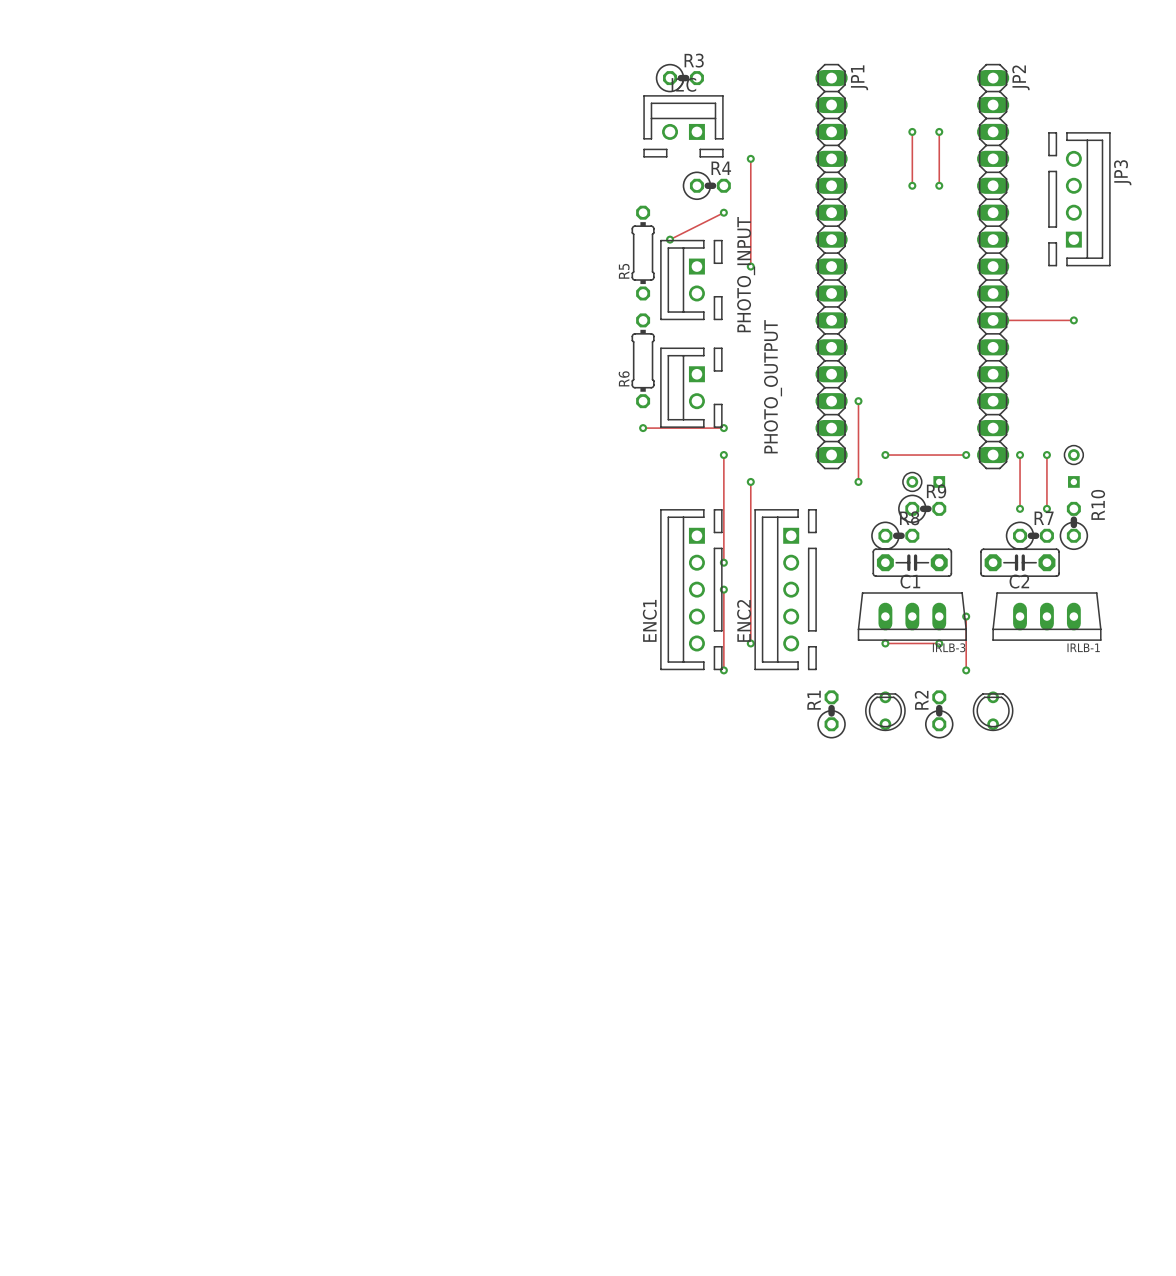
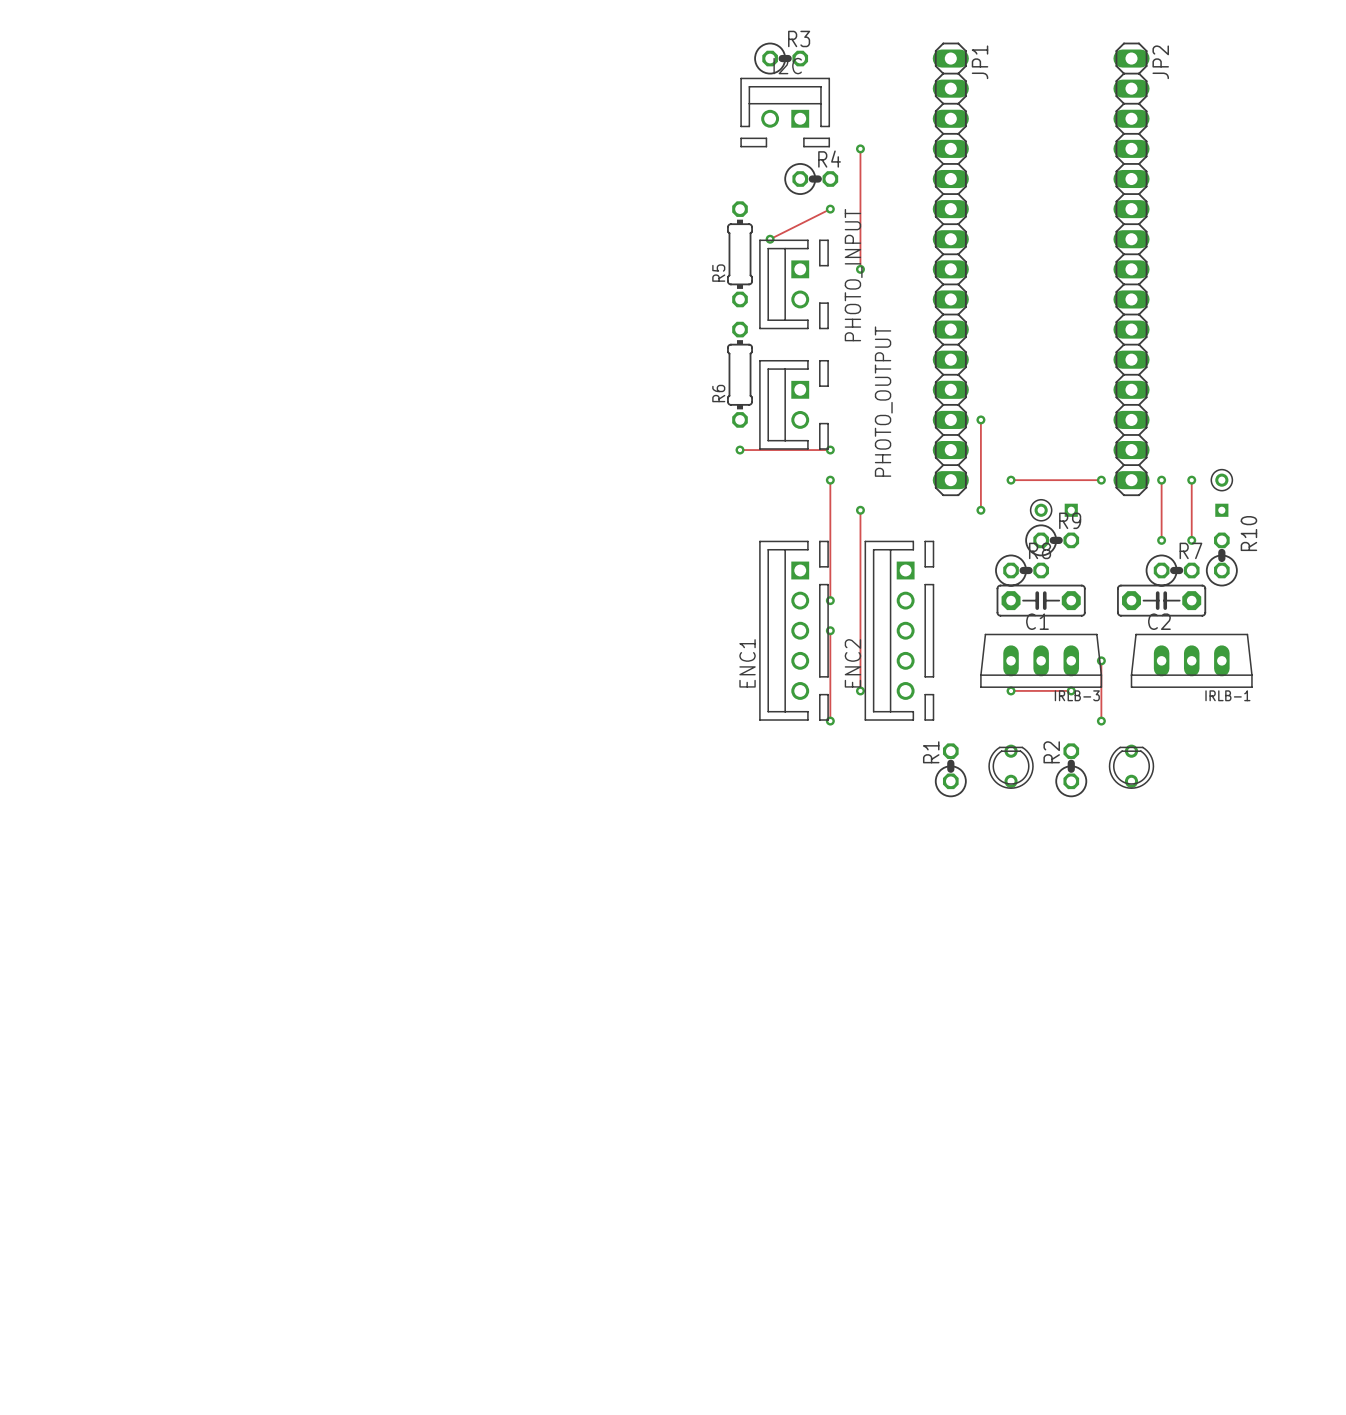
track: (912, 131) (912, 185) -> none
via: (912, 131) -> none
track: (939, 131) (939, 185) -> none
via: (939, 131) -> none
via: (912, 185) -> none
via: (939, 185) -> none
JP3: (1079, 199) -> none
track: (993, 320) (1073, 320) -> none
via: (1073, 320) -> none

